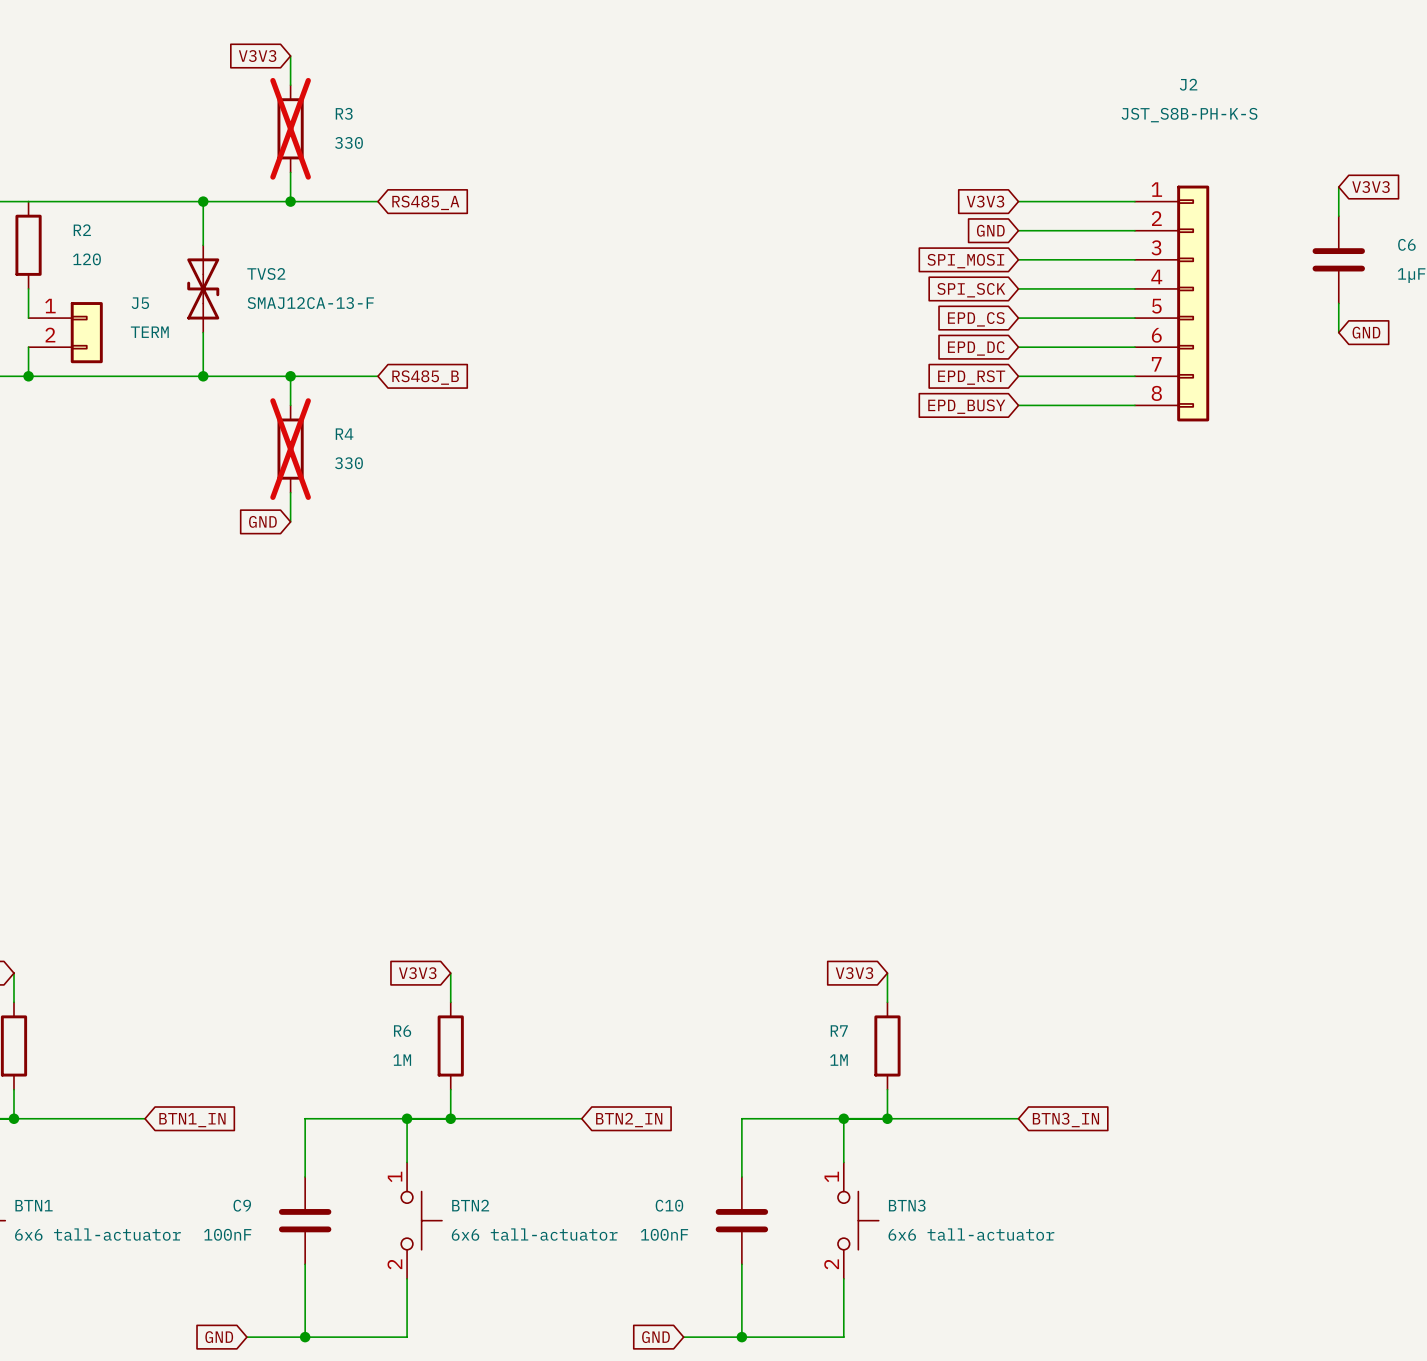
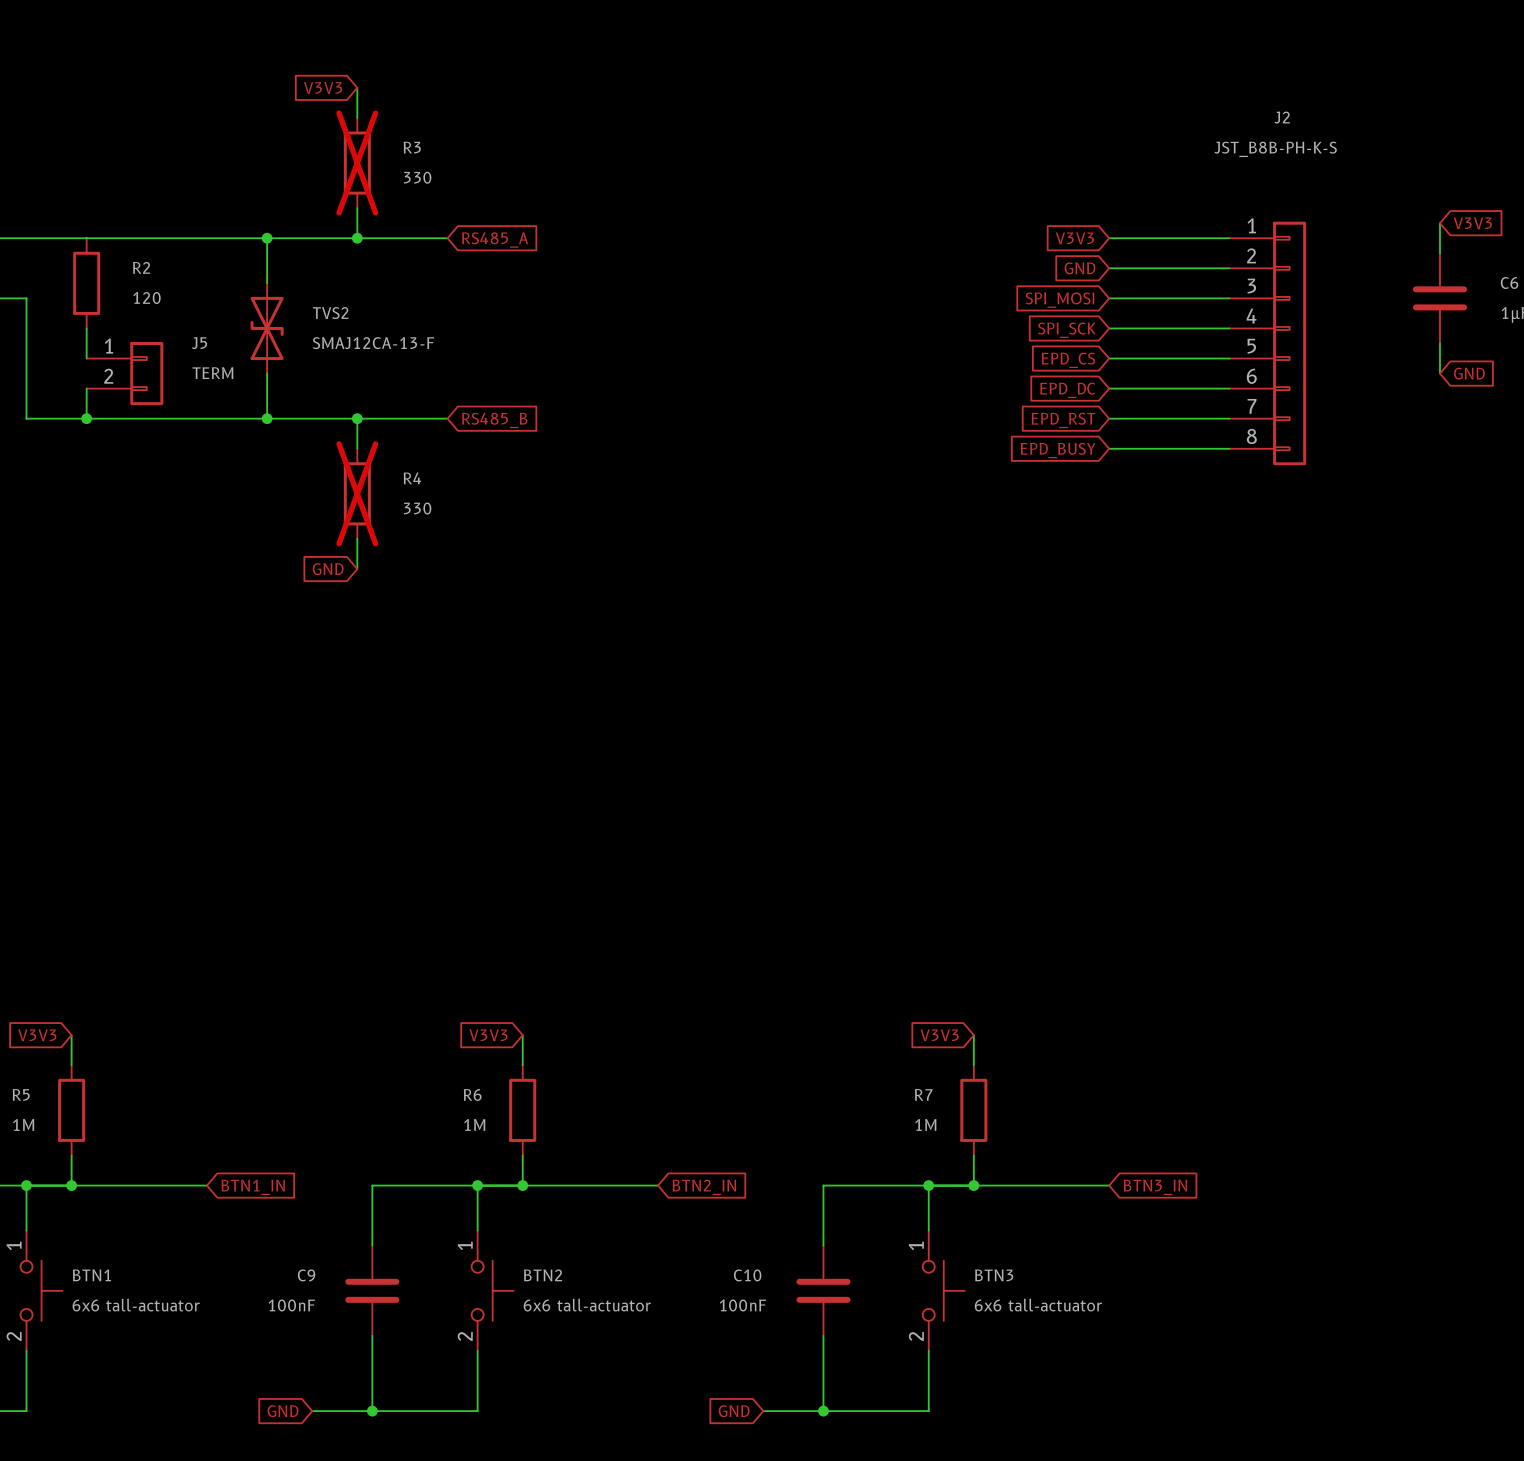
J2 value: JST_S8B-PH-K-S (1189, 115) -> JST_B8B-PH-K-S (1275, 149)

